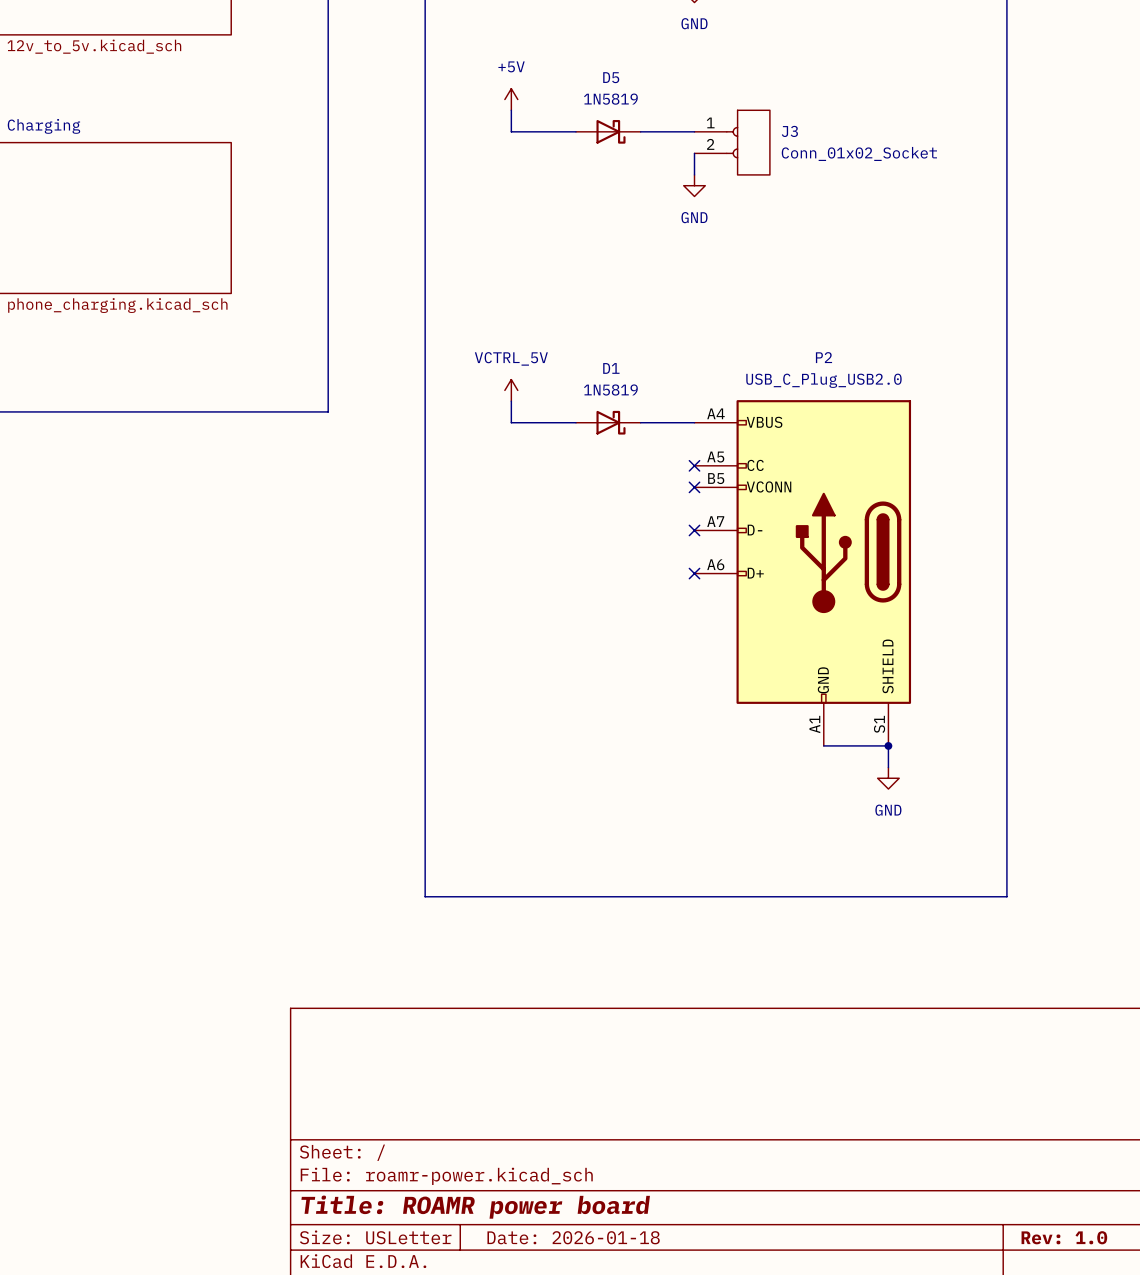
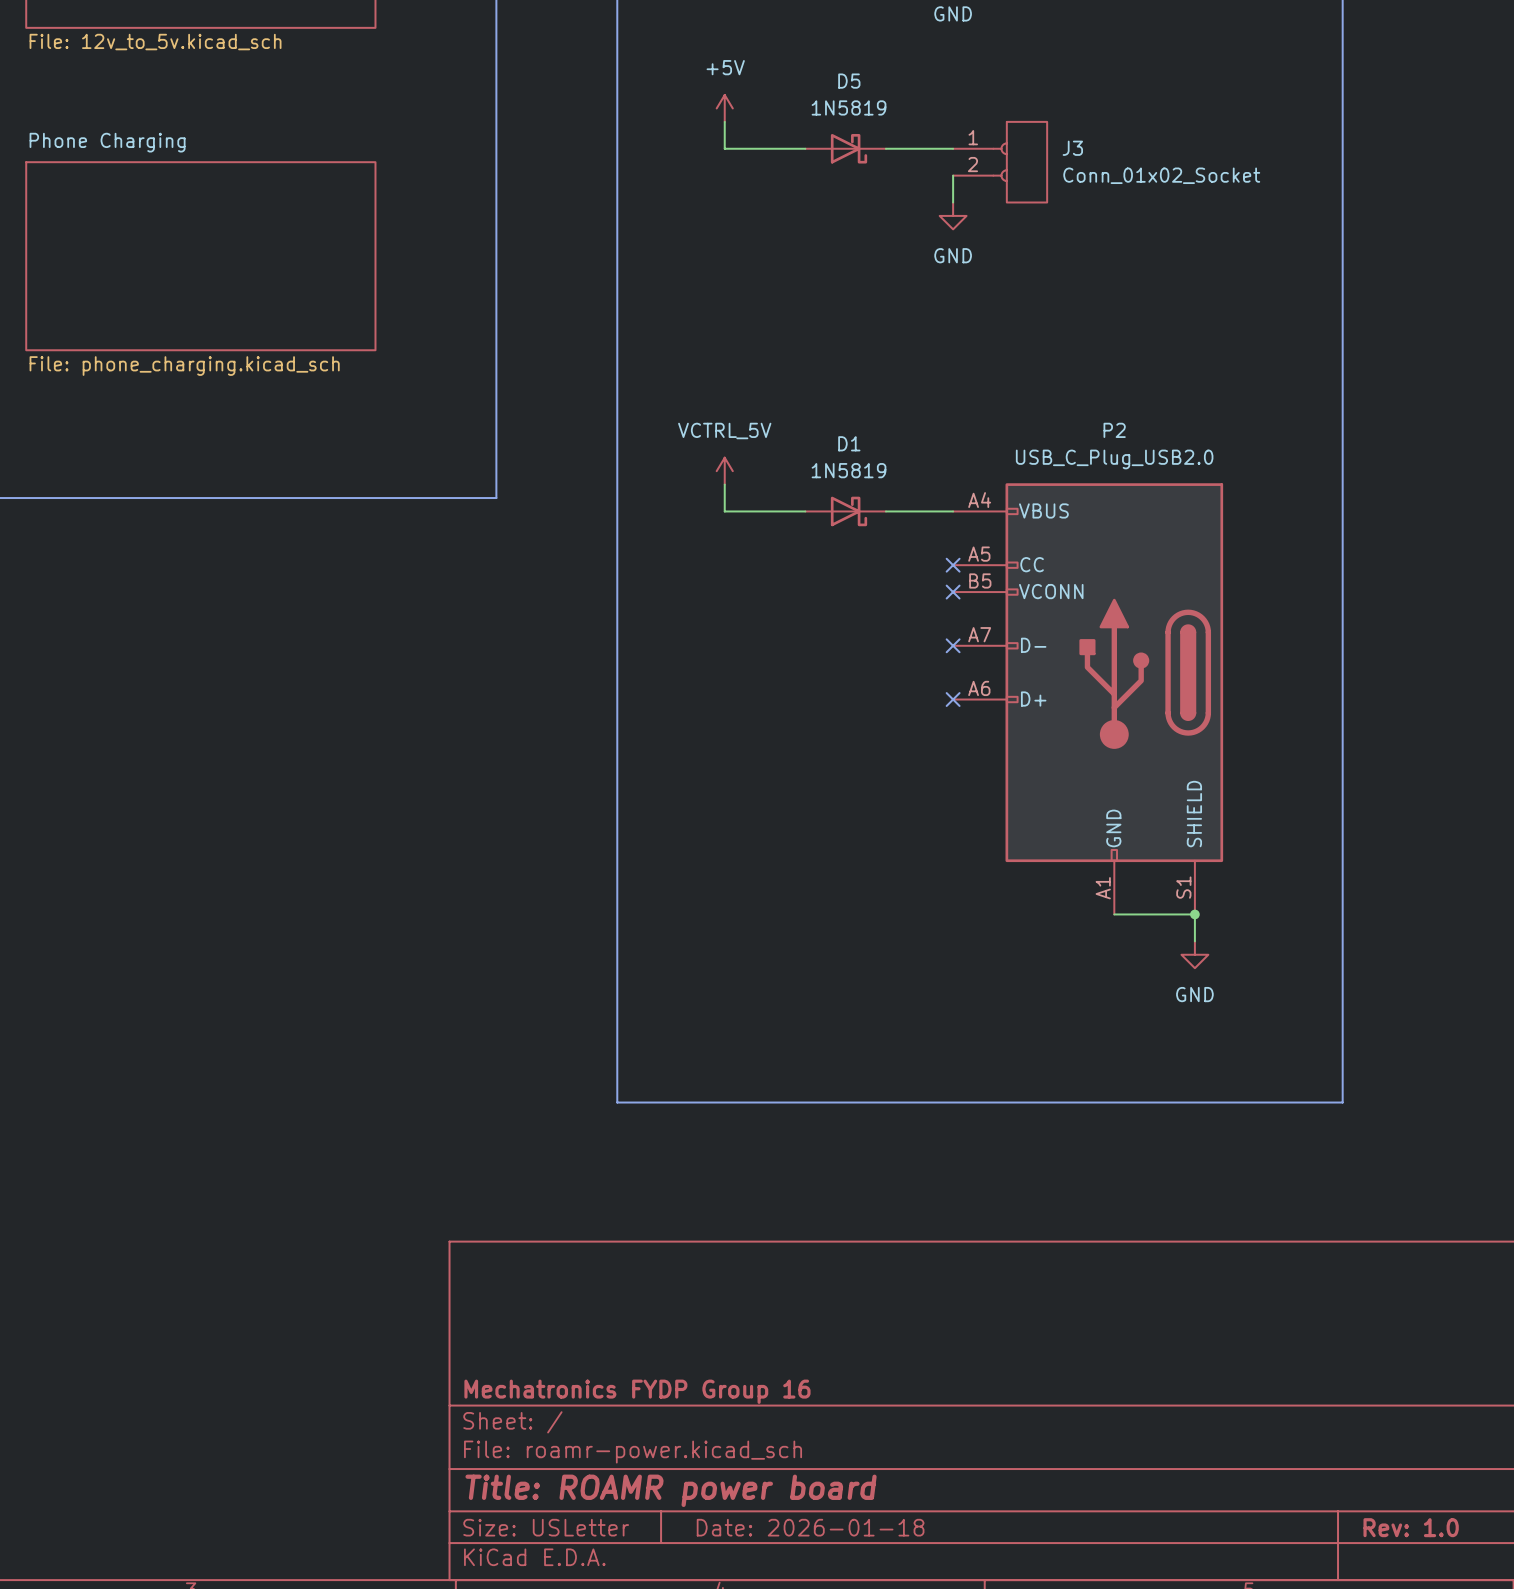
title block: none -> Mechatronics FYDP Group 16 (637, 1391)

